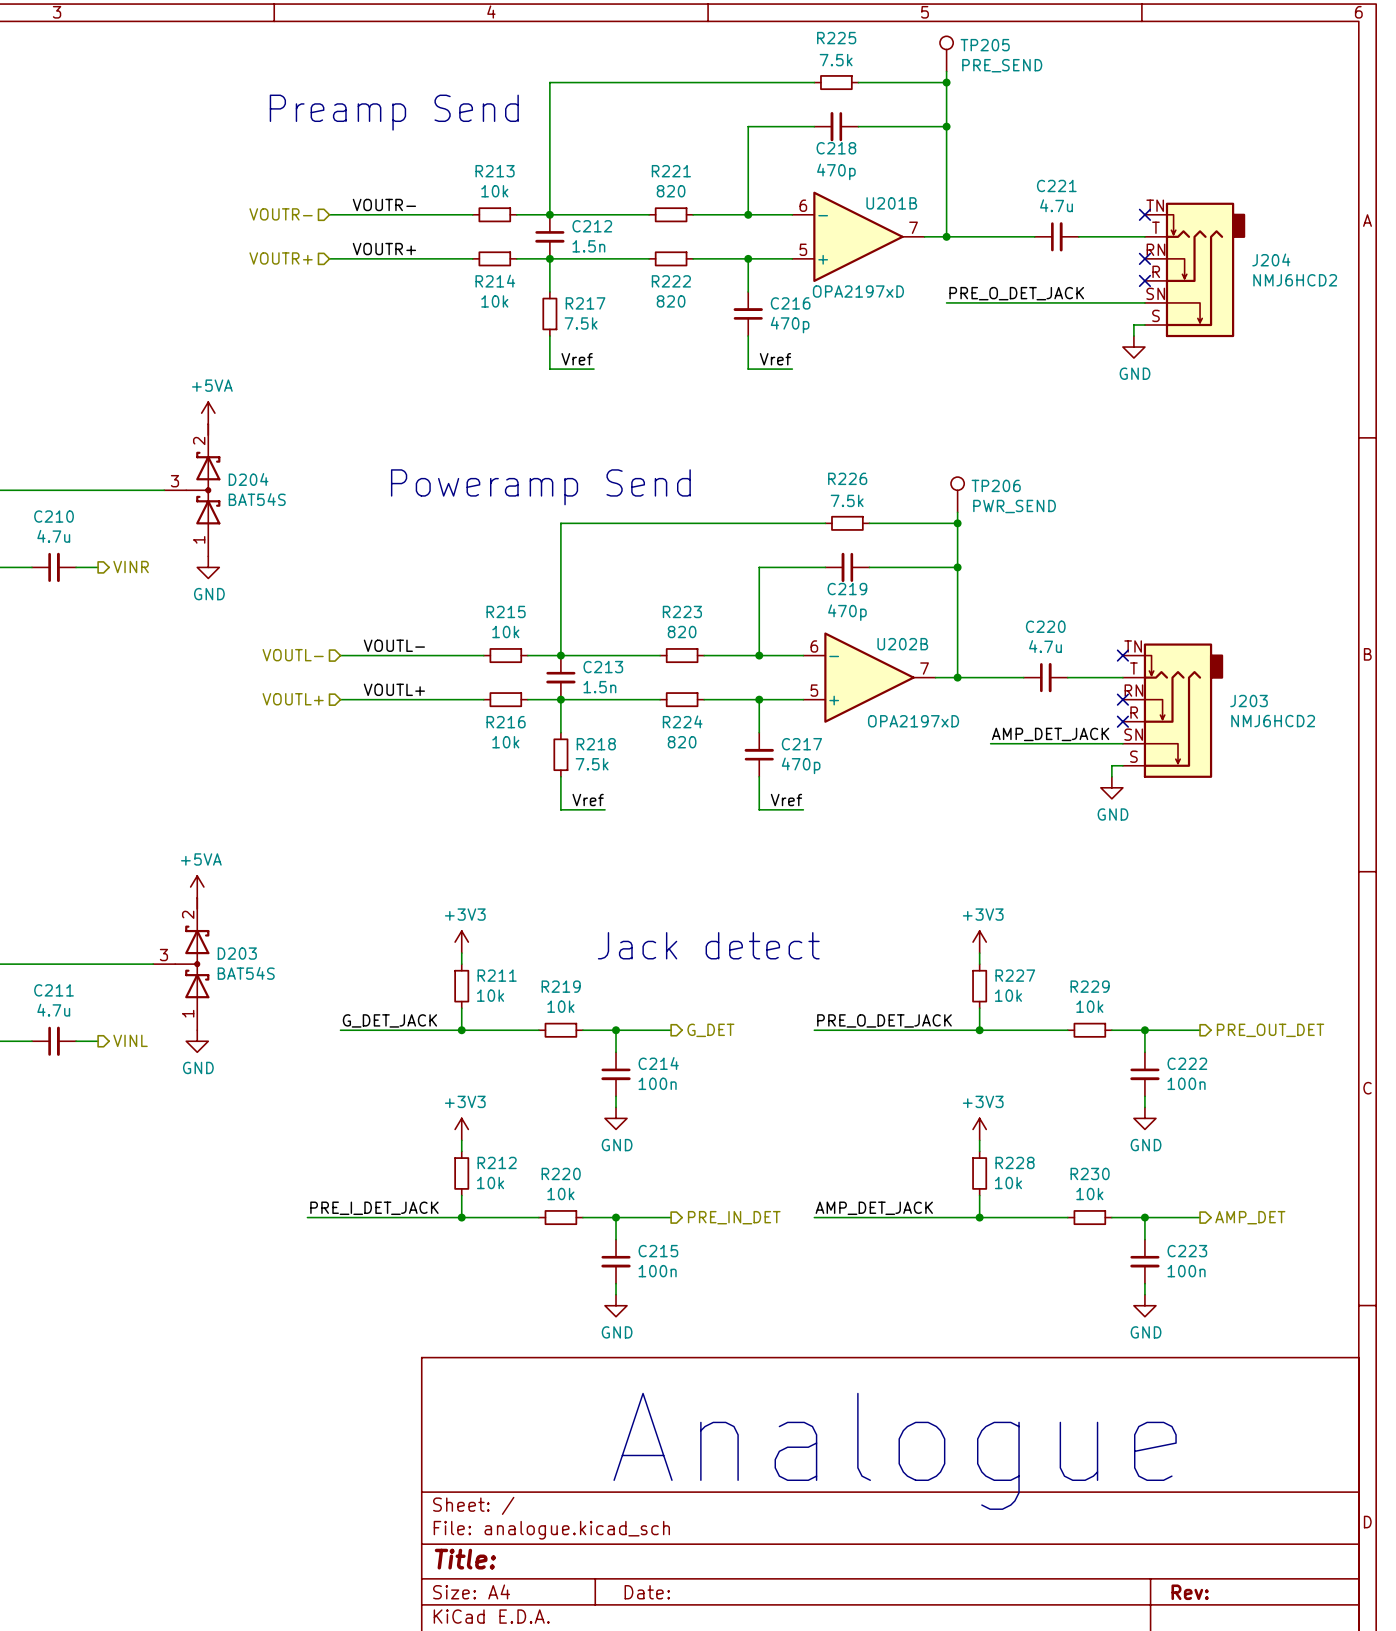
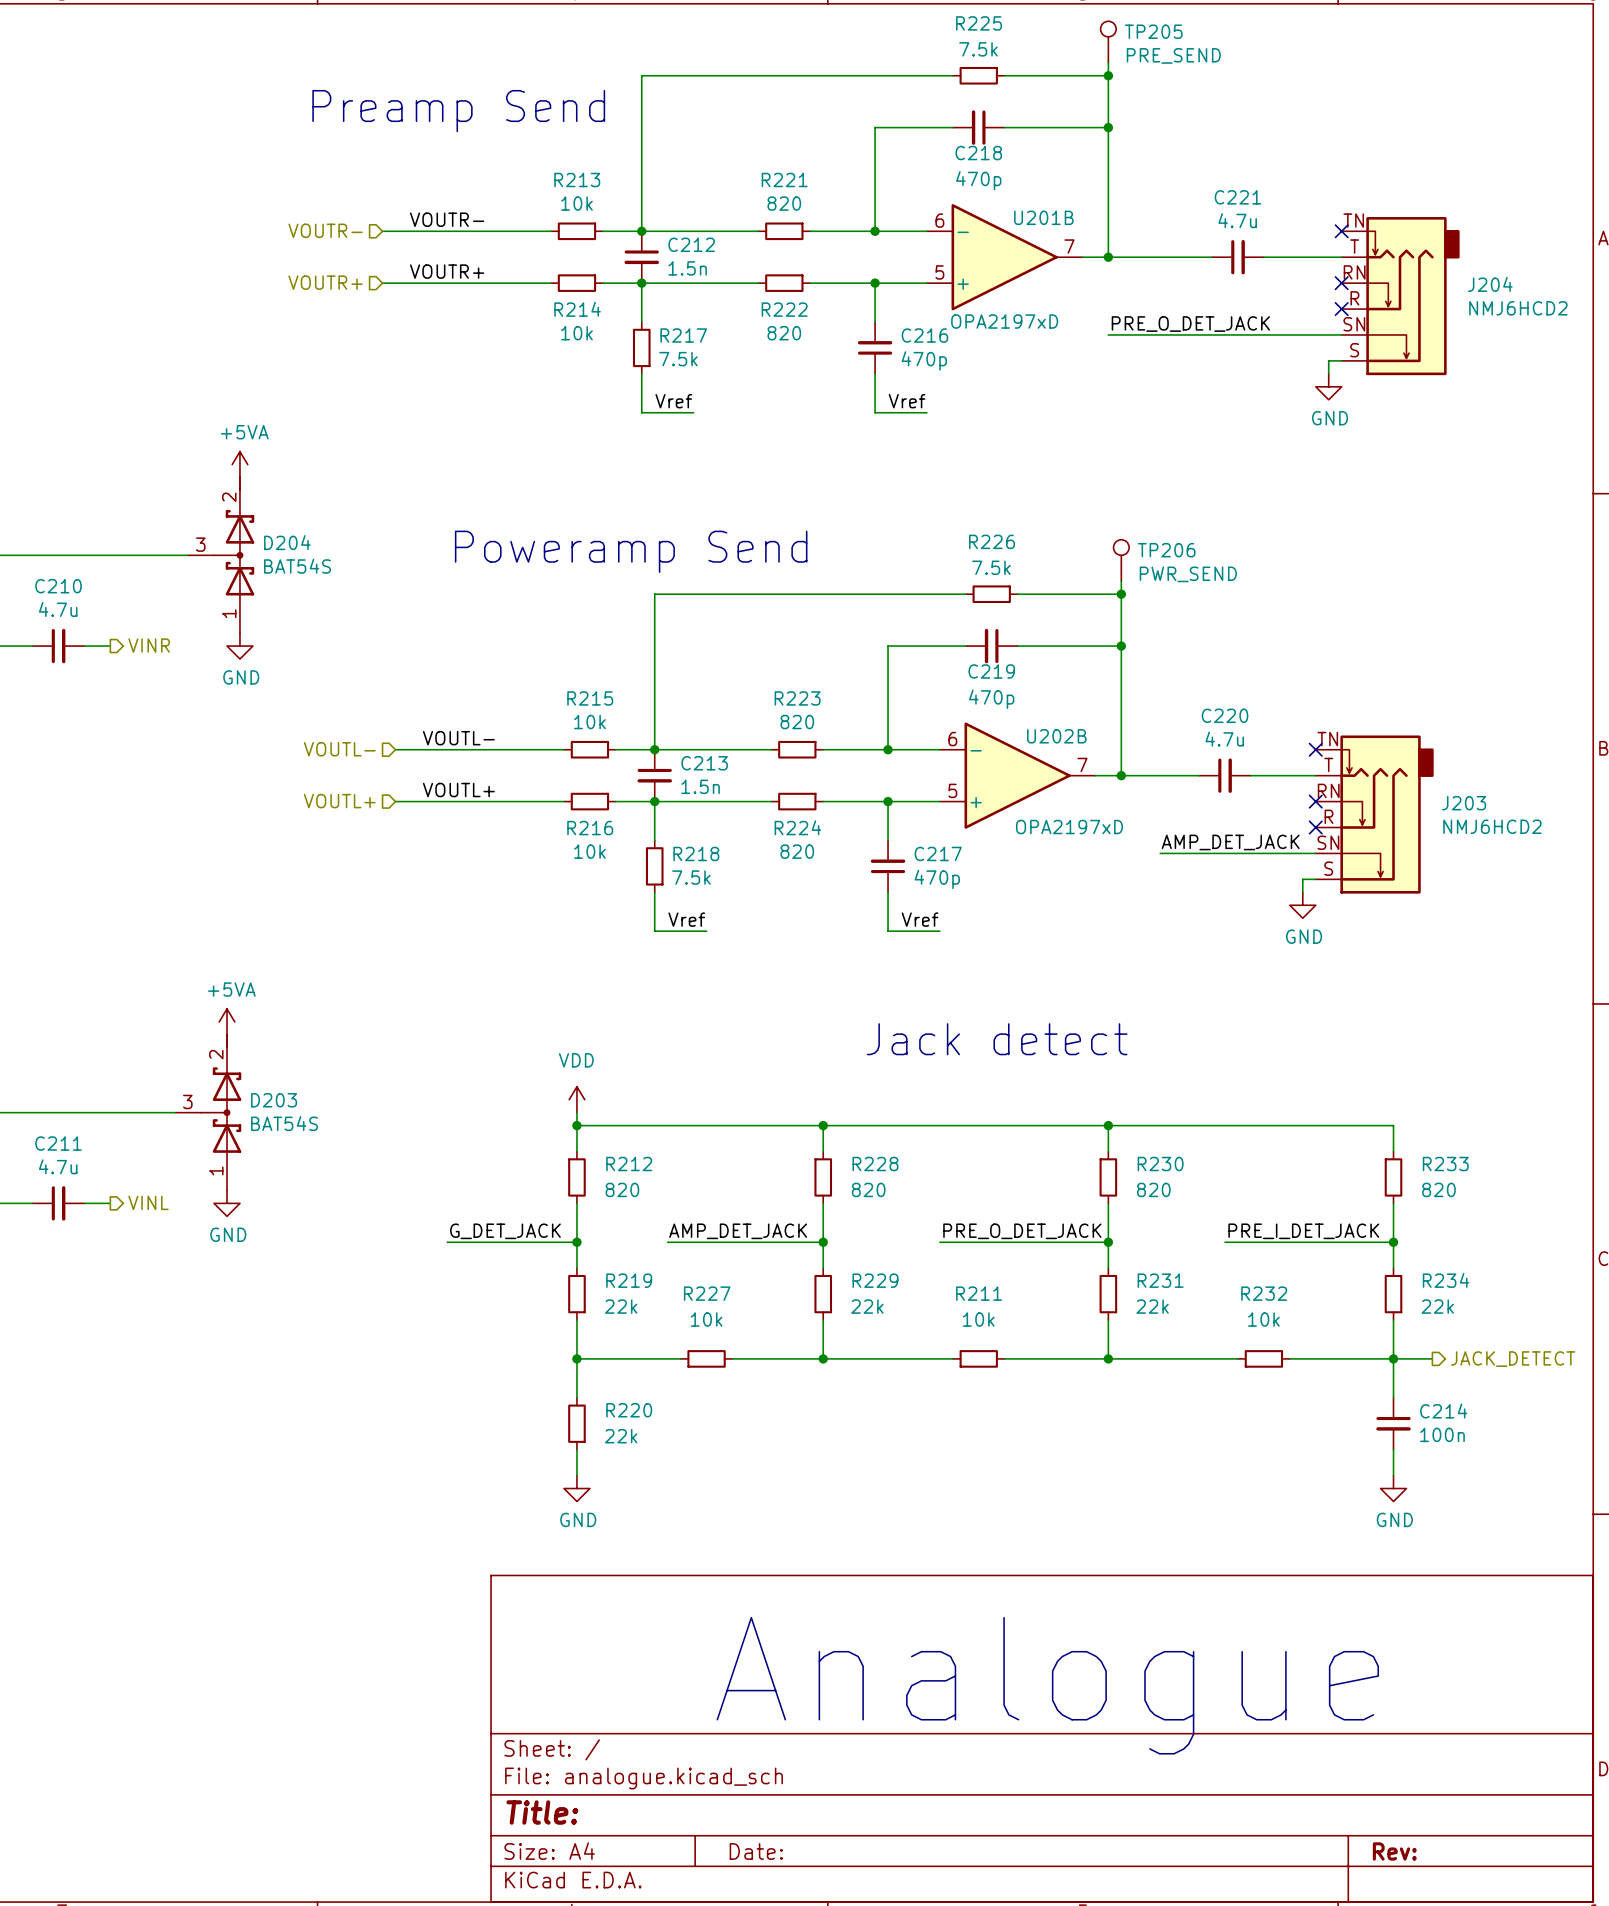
power symbol: +3V3 (461, 942) -> none
power symbol: +3V3 (979, 942) -> none
text position: Jack detect (708, 945) -> Jack detect (997, 1039)
wire: (461, 953) (461, 964) -> none
power symbol: none -> VDD (576, 1099)
wire: (979, 953) (979, 964) -> none
wire: none -> (576, 1112) (576, 1151)
wire: none -> (576, 1125) (1393, 1125) (1393, 1151)
junction: none -> (576, 1125)
R211 name position: R211 (497, 975) -> R211 (979, 1293)
junction: none -> (823, 1125)
junction: none -> (1108, 1125)
R227 name position: R227 (1015, 975) -> R227 (707, 1293)
R211 rotation: 0° (461, 986) -> 90° clockwise (978, 1358)
R211 position: (461, 986) -> (978, 1358)
R227 rotation: 0° (979, 986) -> 90° clockwise (706, 1358)
R227 position: (979, 986) -> (706, 1358)
R211 value position: 10k (490, 995) -> 10k (978, 1319)
R227 value position: 10k (1008, 995) -> 10k (706, 1319)
R219 value: 10k (560, 1006) -> 22k (621, 1306)
R229 value: 10k (1089, 1006) -> 22k (867, 1306)
wire: (461, 1008) (461, 1030) -> none
wire: (979, 1008) (979, 1030) -> (1108, 1125) (1108, 1151)
R233: none -> 820 (1393, 1177)
label position: G_DET_JACK (389, 1020) -> G_DET_JACK (505, 1231)
label position: PRE_O_DET_JACK (884, 1020) -> PRE_O_DET_JACK (1022, 1231)
wire: (340, 1030) (538, 1030) -> none
junction: (461, 1030) -> none
R219 rotation: 0° (560, 1030) -> 90° clockwise (576, 1294)
R219 position: (560, 1030) -> (576, 1294)
wire: (582, 1030) (671, 1030) -> none
wire: (616, 1030) (616, 1052) -> (823, 1125) (823, 1151)
junction: (616, 1030) -> none
hierarchical label: G_DET (710, 1030) -> none
wire: (814, 1030) (1067, 1030) -> none
junction: (979, 1030) -> none
R229 rotation: 0° (1089, 1030) -> 90° clockwise (823, 1294)
R229 position: (1089, 1030) -> (823, 1294)
wire: (1111, 1030) (1200, 1030) -> none
wire: (1144, 1030) (1144, 1052) -> none
junction: (1144, 1030) -> none
hierarchical label: PRE_OUT_DET (1270, 1030) -> none
wire: none -> (576, 1203) (576, 1268)
wire: none -> (823, 1203) (823, 1268)
wire: none -> (1108, 1203) (1108, 1268)
wire: none -> (1393, 1203) (1393, 1268)
label: none -> AMP_DET_JACK (738, 1231)
label: none -> PRE_I_DET_JACK (1303, 1231)
wire: none -> (447, 1242) (576, 1242)
junction: none -> (576, 1242)
wire: none -> (667, 1242) (823, 1242)
C214 position: (616, 1074) -> (1393, 1423)
junction: none -> (823, 1242)
wire: none -> (939, 1242) (1108, 1242)
junction: none -> (1108, 1242)
wire: none -> (1225, 1242) (1393, 1242)
C222: 100n (1144, 1074) -> none
junction: none -> (1393, 1242)
wire: (616, 1096) (616, 1107) -> none
wire: (1144, 1096) (1144, 1107) -> none
power symbol: GND (616, 1118) -> none
R231: none -> 22k (1108, 1294)
power symbol: GND (1144, 1118) -> none
R234: none -> 22k (1393, 1294)
power symbol: +3V3 (461, 1129) -> none
power symbol: +3V3 (979, 1129) -> none
wire: (461, 1140) (461, 1151) -> none
wire: none -> (576, 1320) (576, 1397)
wire: none -> (823, 1320) (823, 1358)
wire: none -> (1108, 1320) (1108, 1358)
wire: (979, 1140) (979, 1151) -> none
wire: none -> (1393, 1320) (1393, 1397)
R212 name position: R212 (497, 1162) -> R212 (629, 1164)
R228 name position: R228 (1015, 1162) -> R228 (875, 1164)
R212 position: (461, 1173) -> (576, 1177)
junction: none -> (576, 1358)
wire: none -> (732, 1358) (952, 1358)
junction: none -> (823, 1358)
wire: none -> (1004, 1358) (1237, 1358)
junction: none -> (1108, 1358)
R228 position: (979, 1173) -> (823, 1177)
R232: none -> 10k (1263, 1358)
wire: none -> (1289, 1358) (1432, 1358)
junction: none -> (1393, 1358)
hierarchical label: none -> JACK_DETECT (1513, 1359)
R212 value: 10k (490, 1183) -> 820 (622, 1189)
R228 value: 10k (1008, 1183) -> 820 (868, 1189)
R220 value: 10k (560, 1194) -> 22k (621, 1436)
R230 value: 10k (1089, 1194) -> 820 (1153, 1189)
wire: (461, 1195) (461, 1217) -> (576, 1449) (576, 1475)
wire: (979, 1195) (979, 1217) -> none
label: PRE_I_DET_JACK (374, 1208) -> none
label: AMP_DET_JACK (874, 1208) -> none
wire: (307, 1217) (538, 1217) -> none
junction: (461, 1217) -> none
R220 rotation: 0° (560, 1217) -> 90° clockwise (576, 1423)
R220 position: (560, 1217) -> (576, 1423)
wire: (582, 1217) (671, 1217) -> (576, 1358) (680, 1358)
wire: (616, 1217) (616, 1239) -> none
junction: (616, 1217) -> none
hierarchical label: PRE_IN_DET (734, 1217) -> none
wire: (814, 1217) (1067, 1217) -> none
junction: (979, 1217) -> none
R230 rotation: 0° (1089, 1217) -> 90° clockwise (1108, 1177)
R230 position: (1089, 1217) -> (1108, 1177)
wire: (1111, 1217) (1200, 1217) -> none
wire: (1144, 1217) (1144, 1239) -> (1393, 1449) (1393, 1475)
junction: (1144, 1217) -> none
hierarchical label: AMP_DET (1250, 1217) -> none
C215: 100n (616, 1261) -> none
C223: 100n (1144, 1261) -> none
power symbol: none -> GND (576, 1488)
wire: (616, 1283) (616, 1294) -> none
wire: (1144, 1283) (1144, 1294) -> none
power symbol: GND (616, 1305) -> none
power symbol position: GND (1144, 1305) -> GND (1393, 1488)

